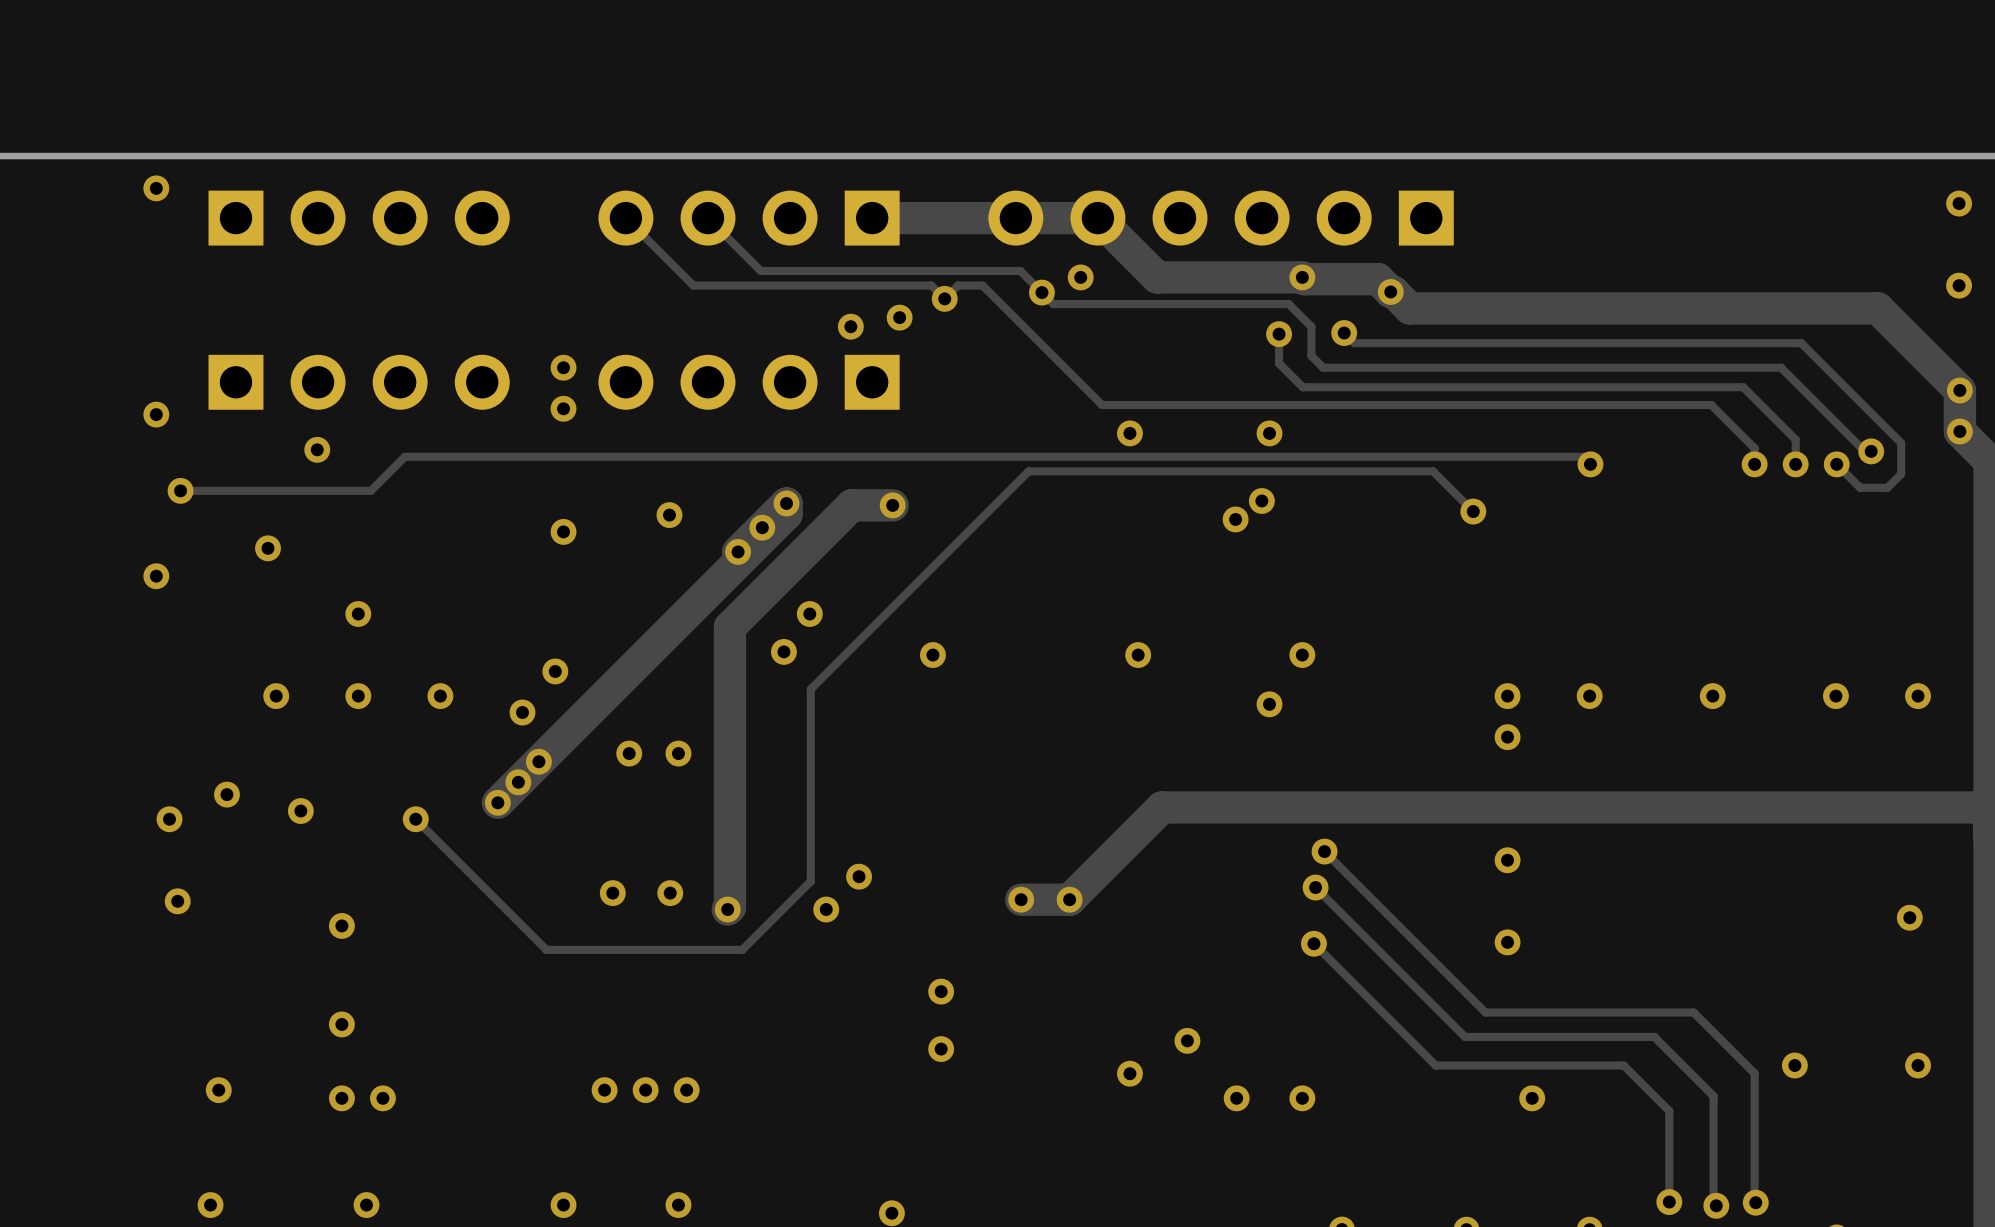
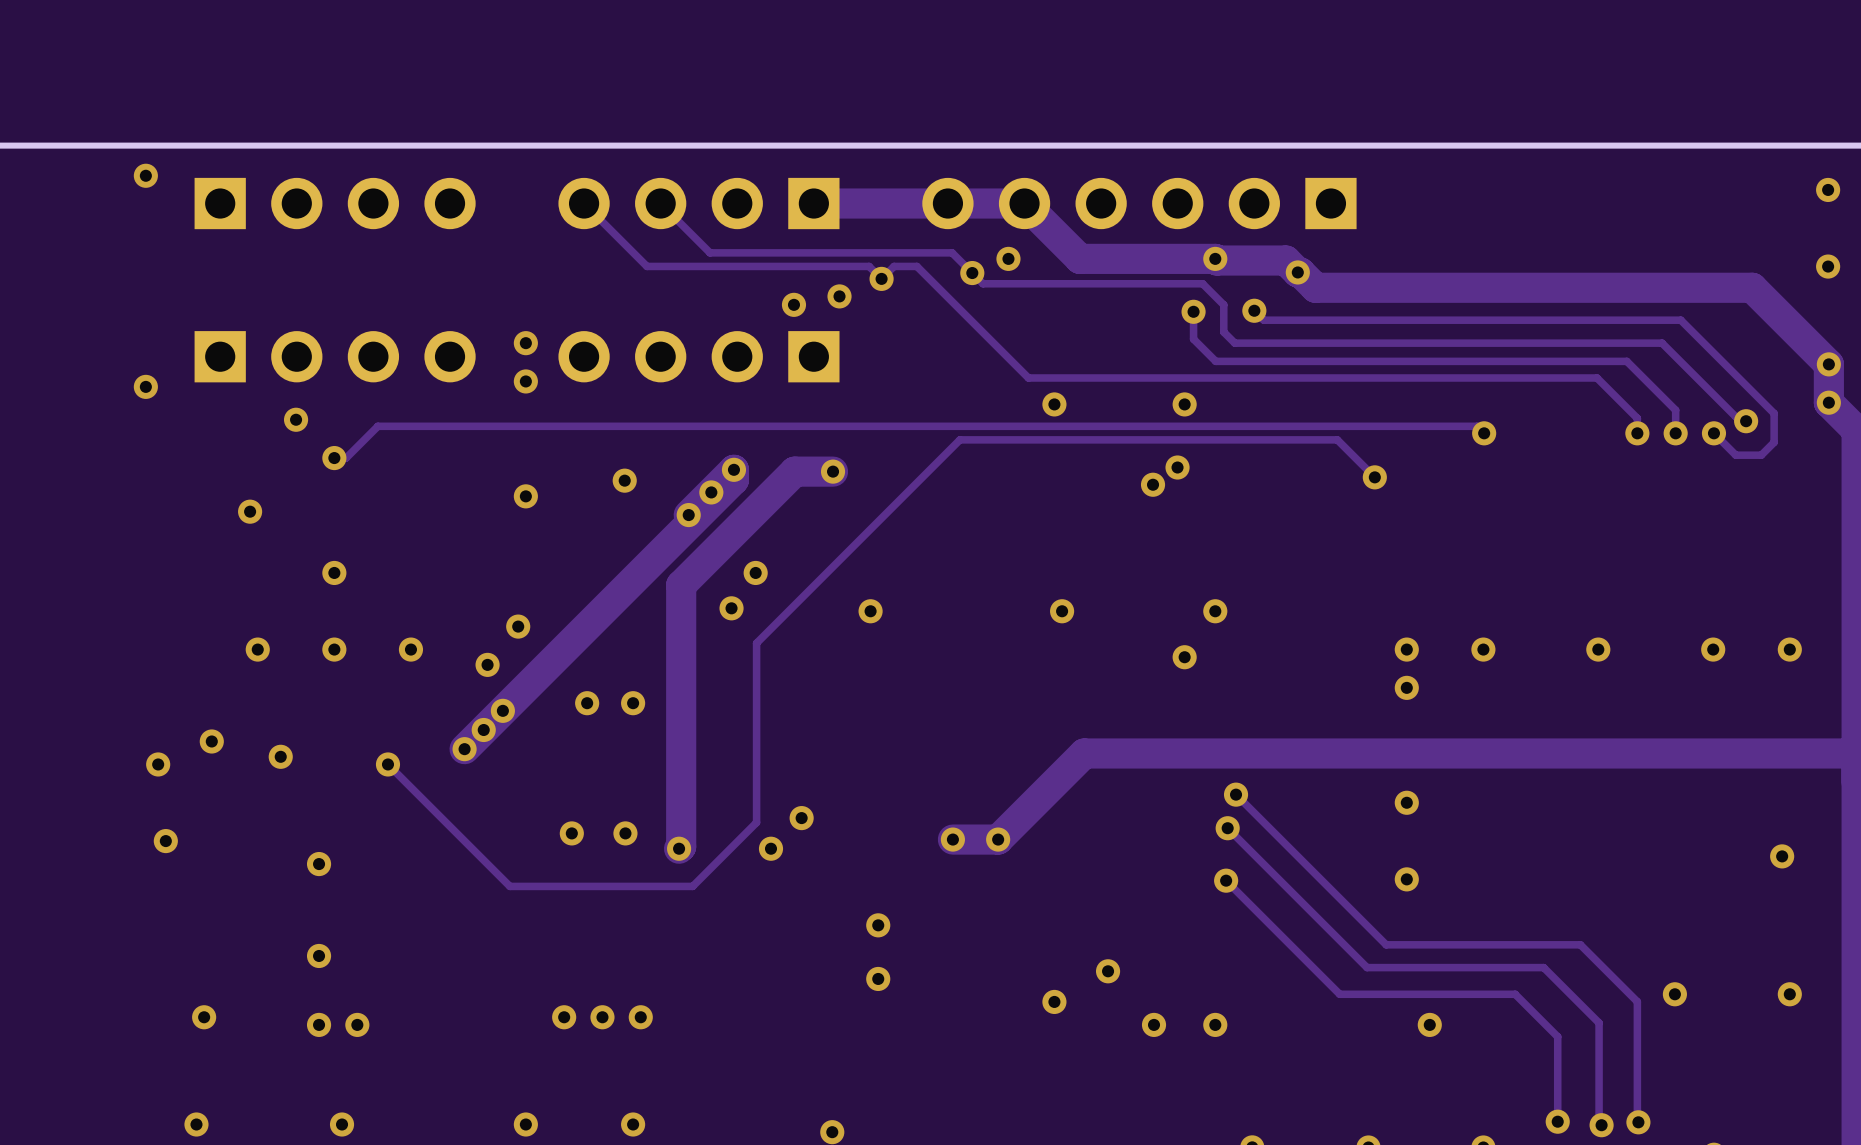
via: (180, 490) -> none
track: (358, 490) (180, 490) -> none
via: none -> (334, 458)
via: (156, 576) -> none

